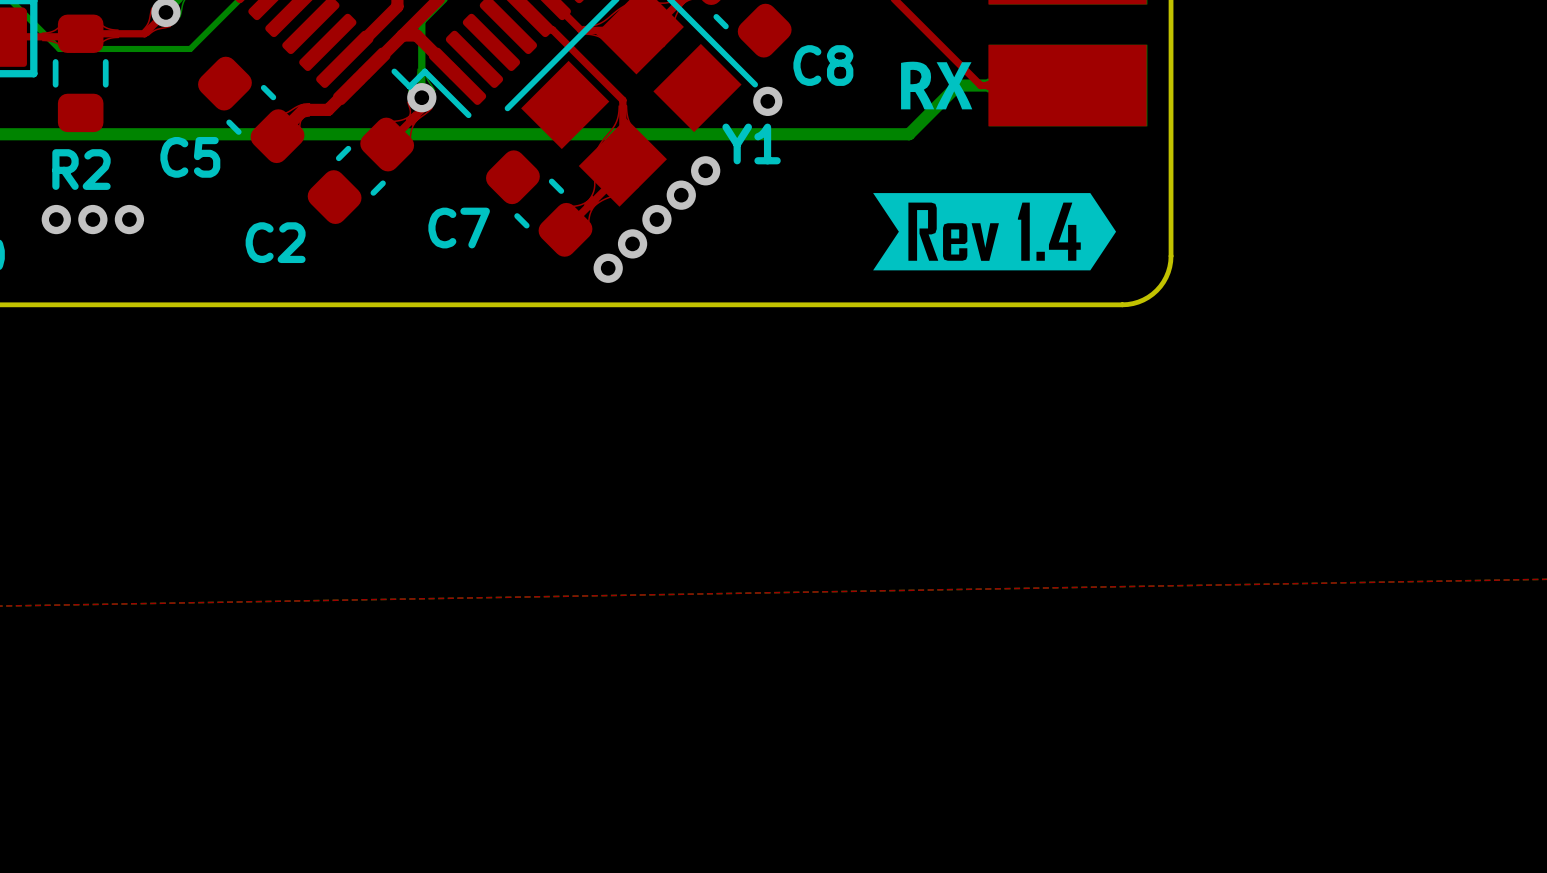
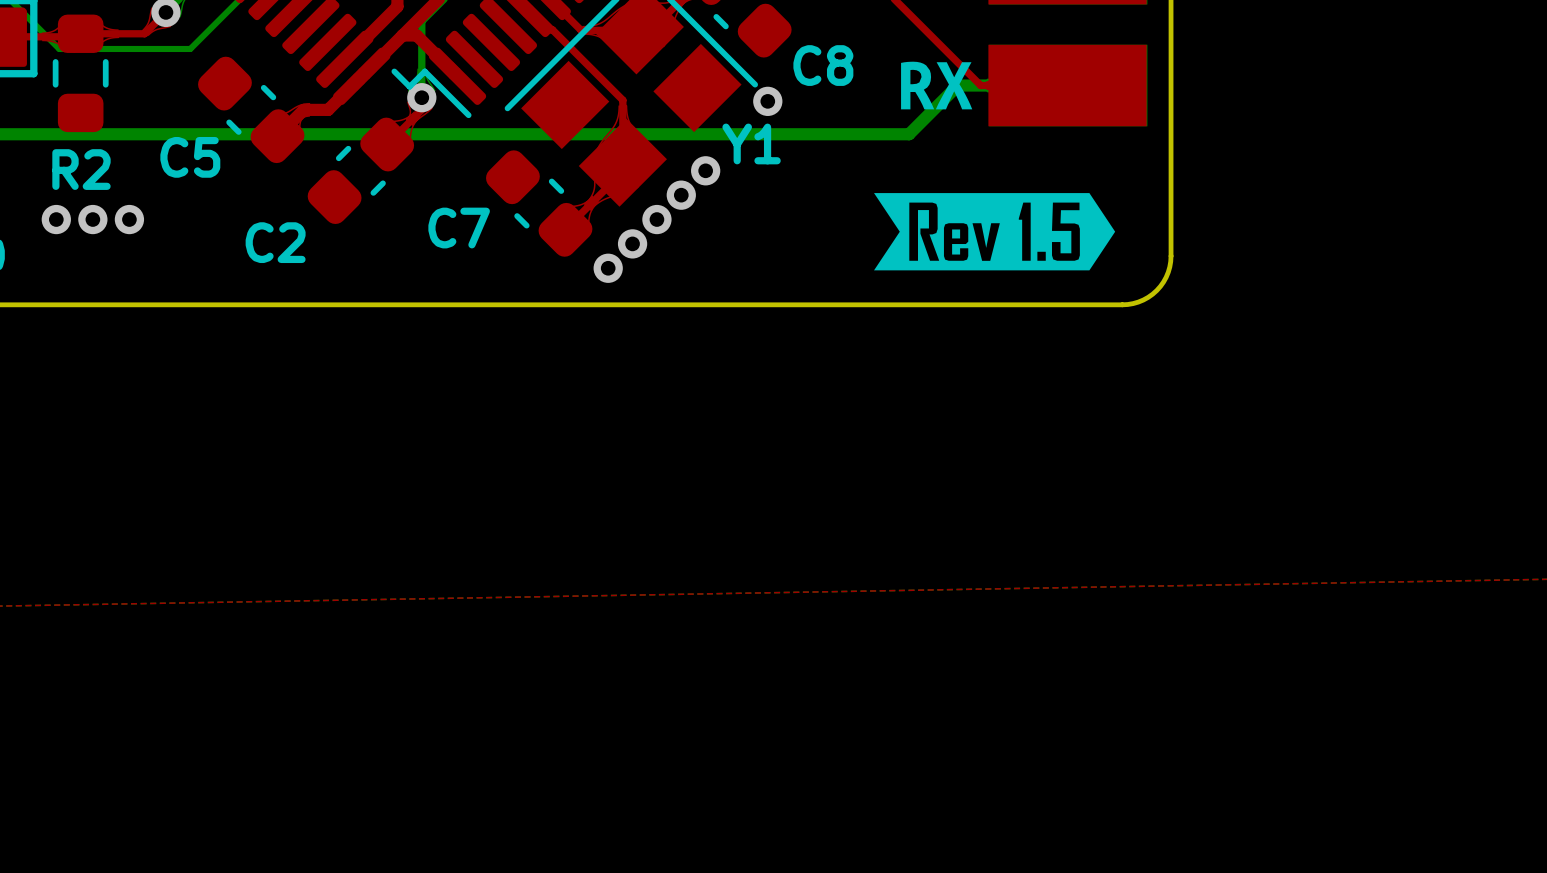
drawing shape: [873, 193, 1117, 271] -> [874, 193, 1116, 271]

